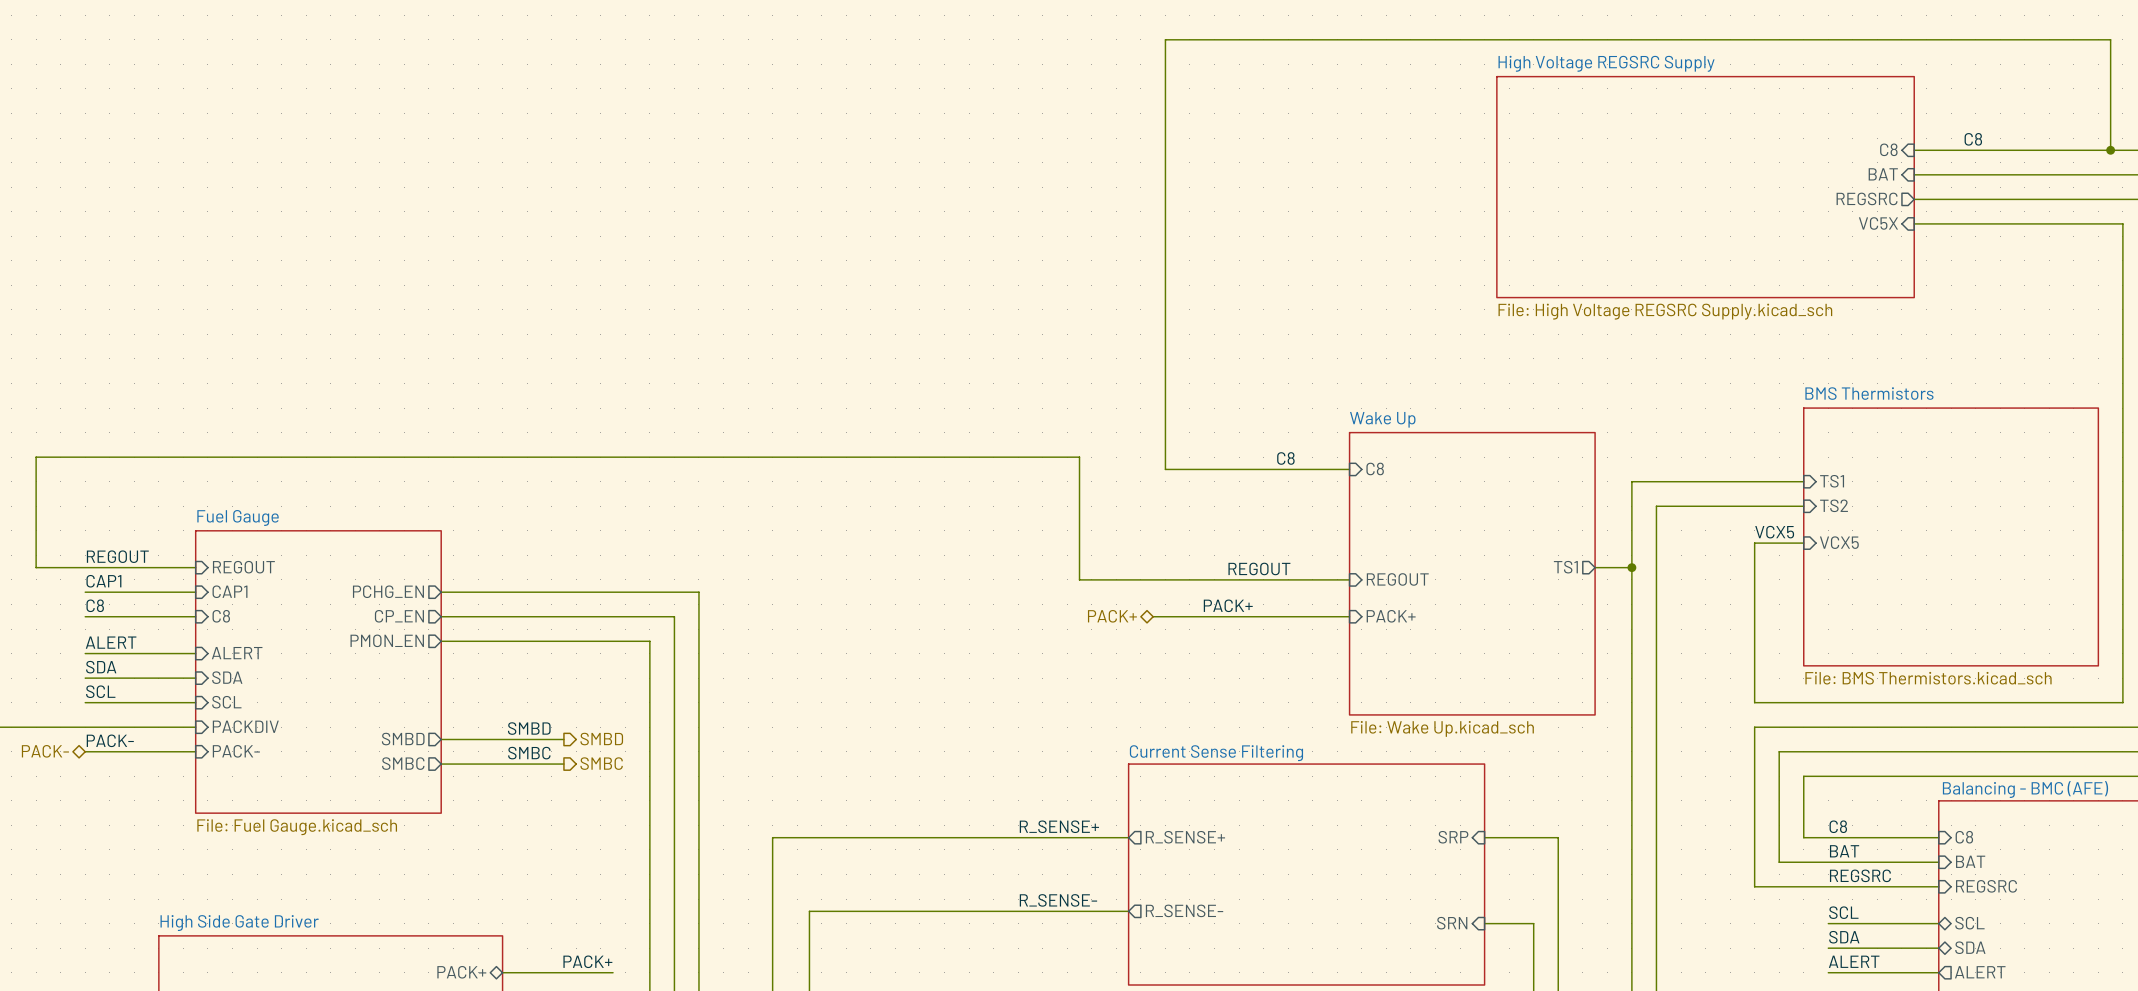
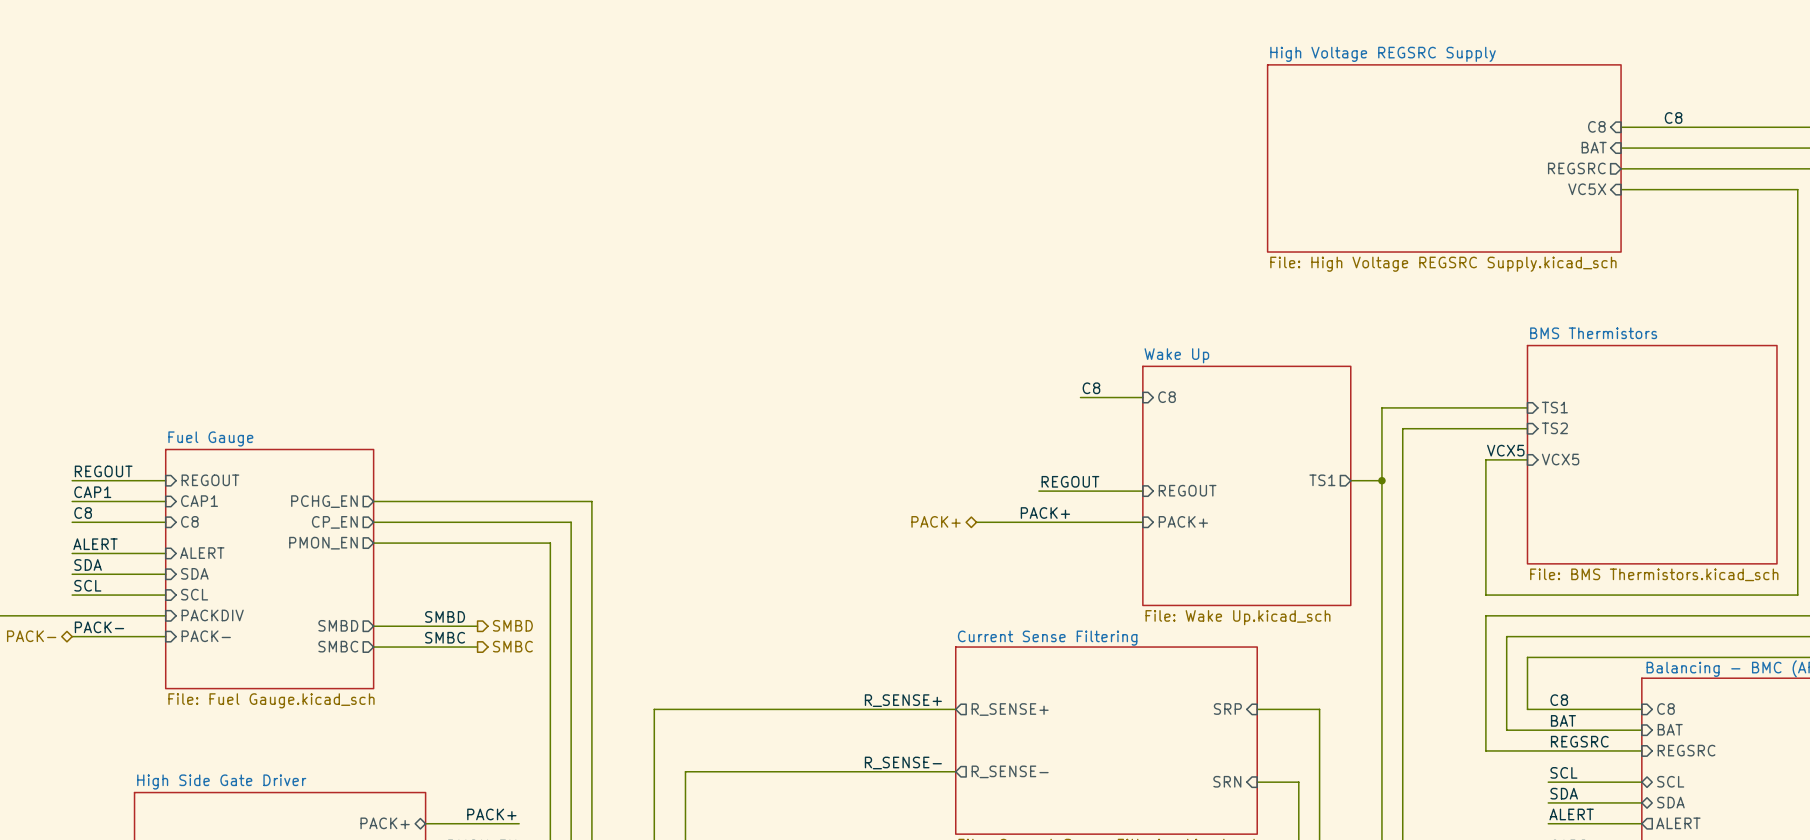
wire: (2110, 150) (2110, 39) (1165, 39) (1165, 469) (1275, 469) -> none
junction: (2110, 150) -> none
wire: (85, 567) (36, 567) (36, 457) (1079, 457) (1079, 579) (1226, 579) -> none

